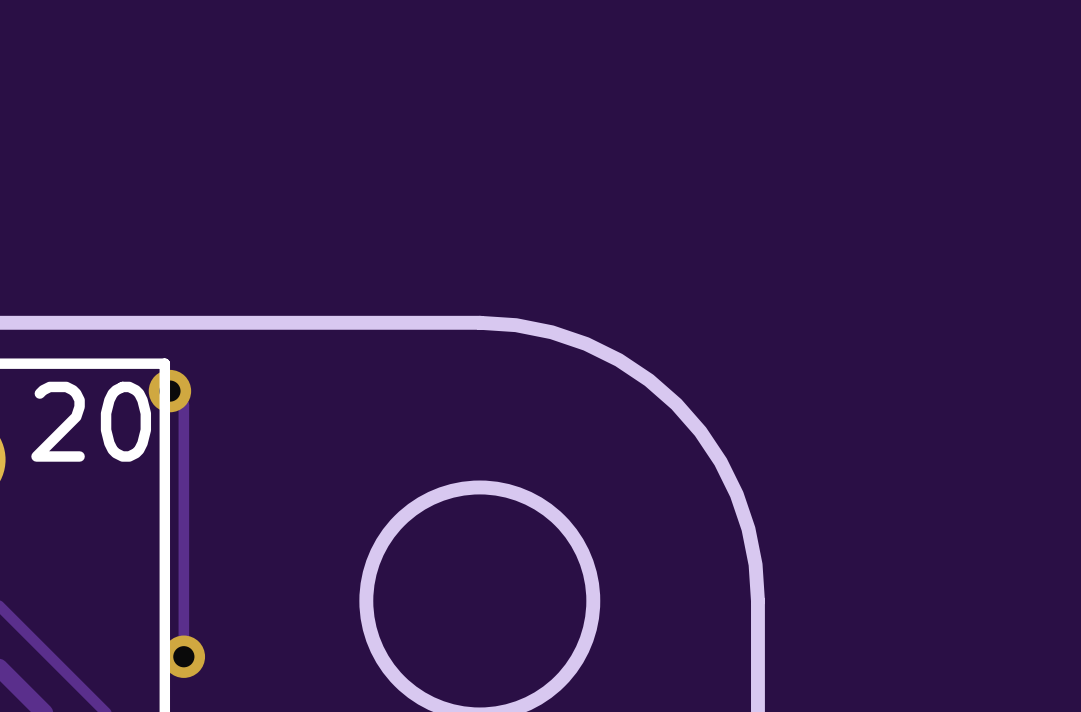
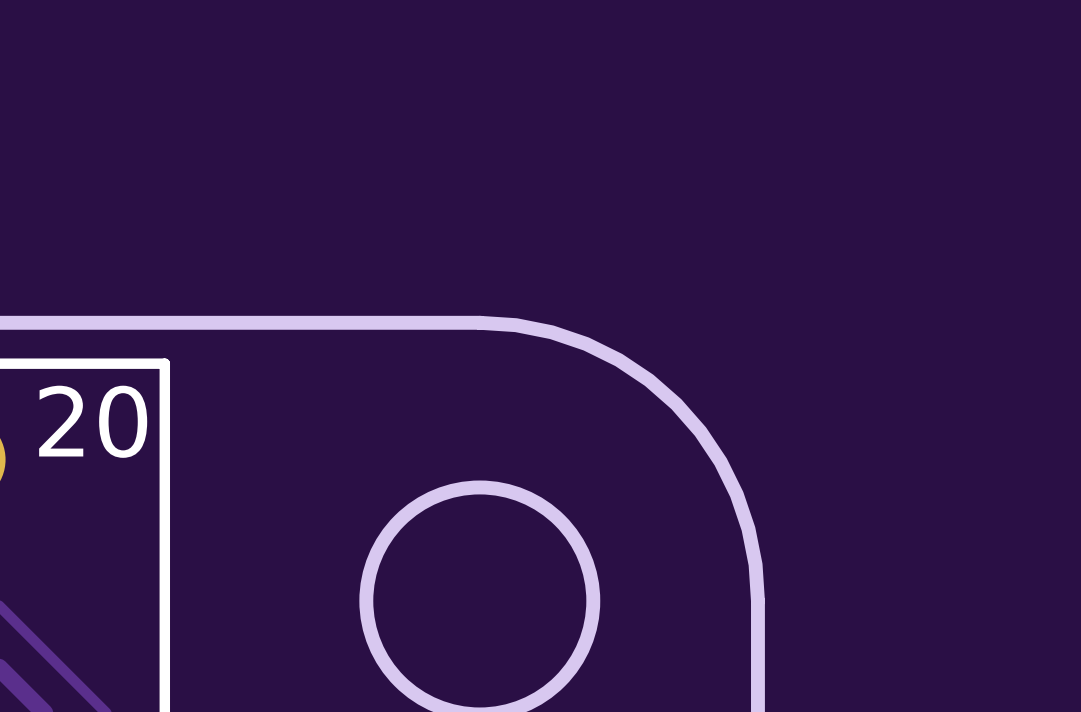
track: (169, 391) (183, 404) (183, 656) -> none
via: (169, 391) -> none
via: (183, 656) -> none

